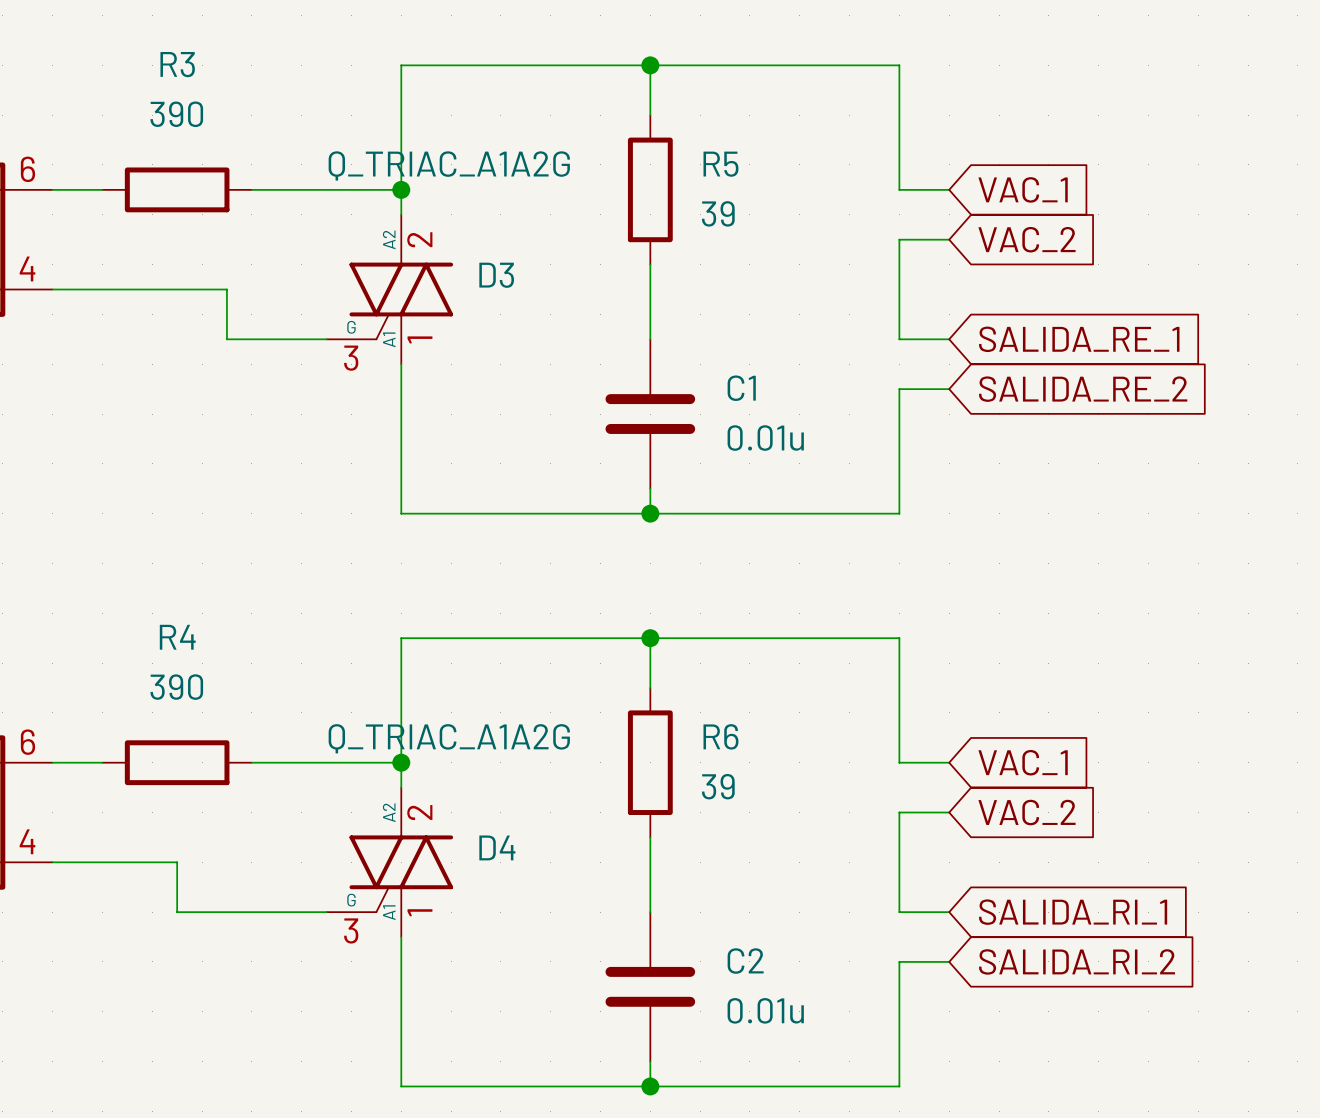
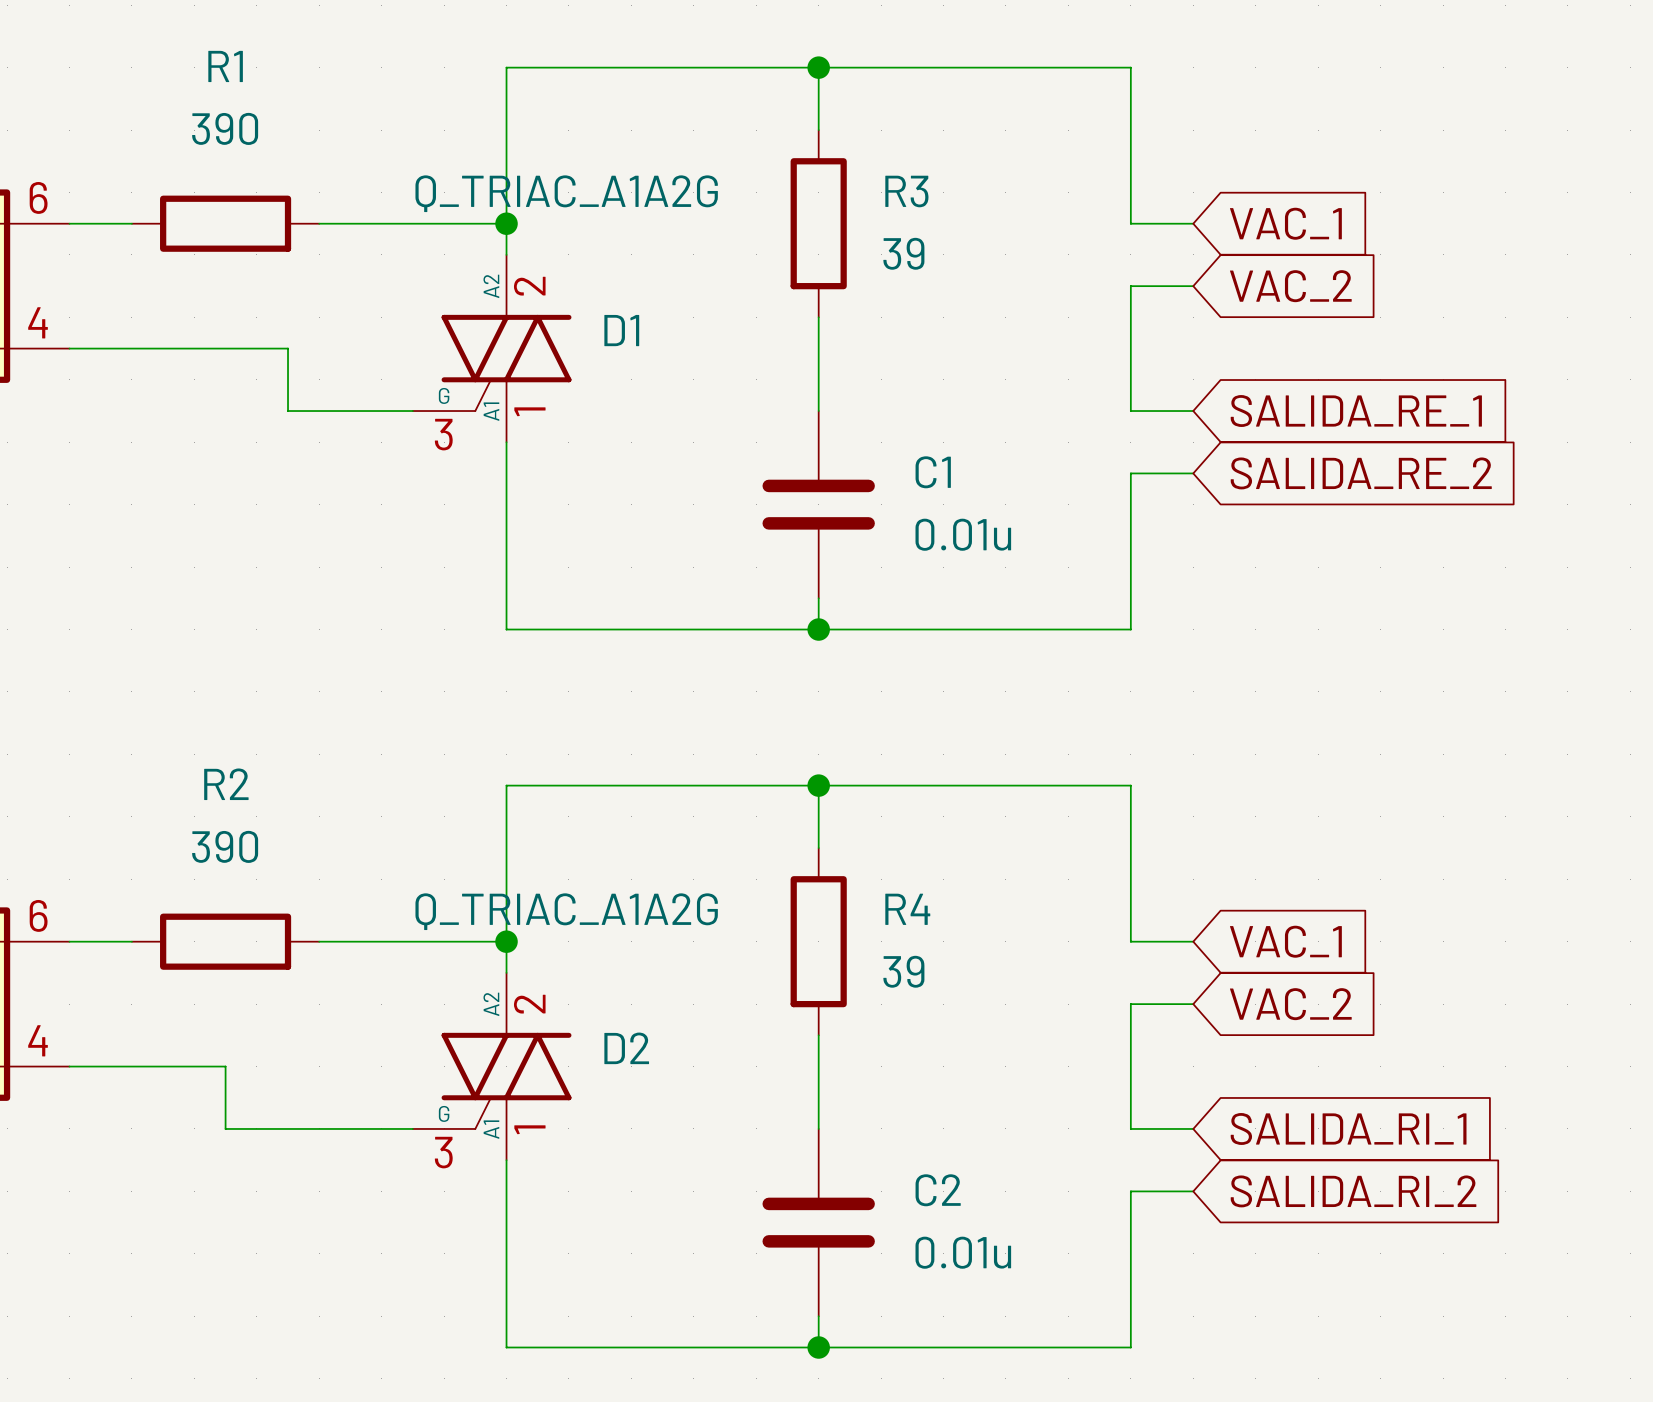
R3 name: R3 (177, 64) -> R1 (225, 66)
R5 name: R5 (720, 164) -> R3 (906, 191)
D3 name: D3 (496, 275) -> D1 (621, 330)
R4 name: R4 (177, 637) -> R2 (226, 784)
R6 name: R6 (720, 736) -> R4 (907, 909)
D4 name: D4 (497, 847) -> D2 (626, 1048)

